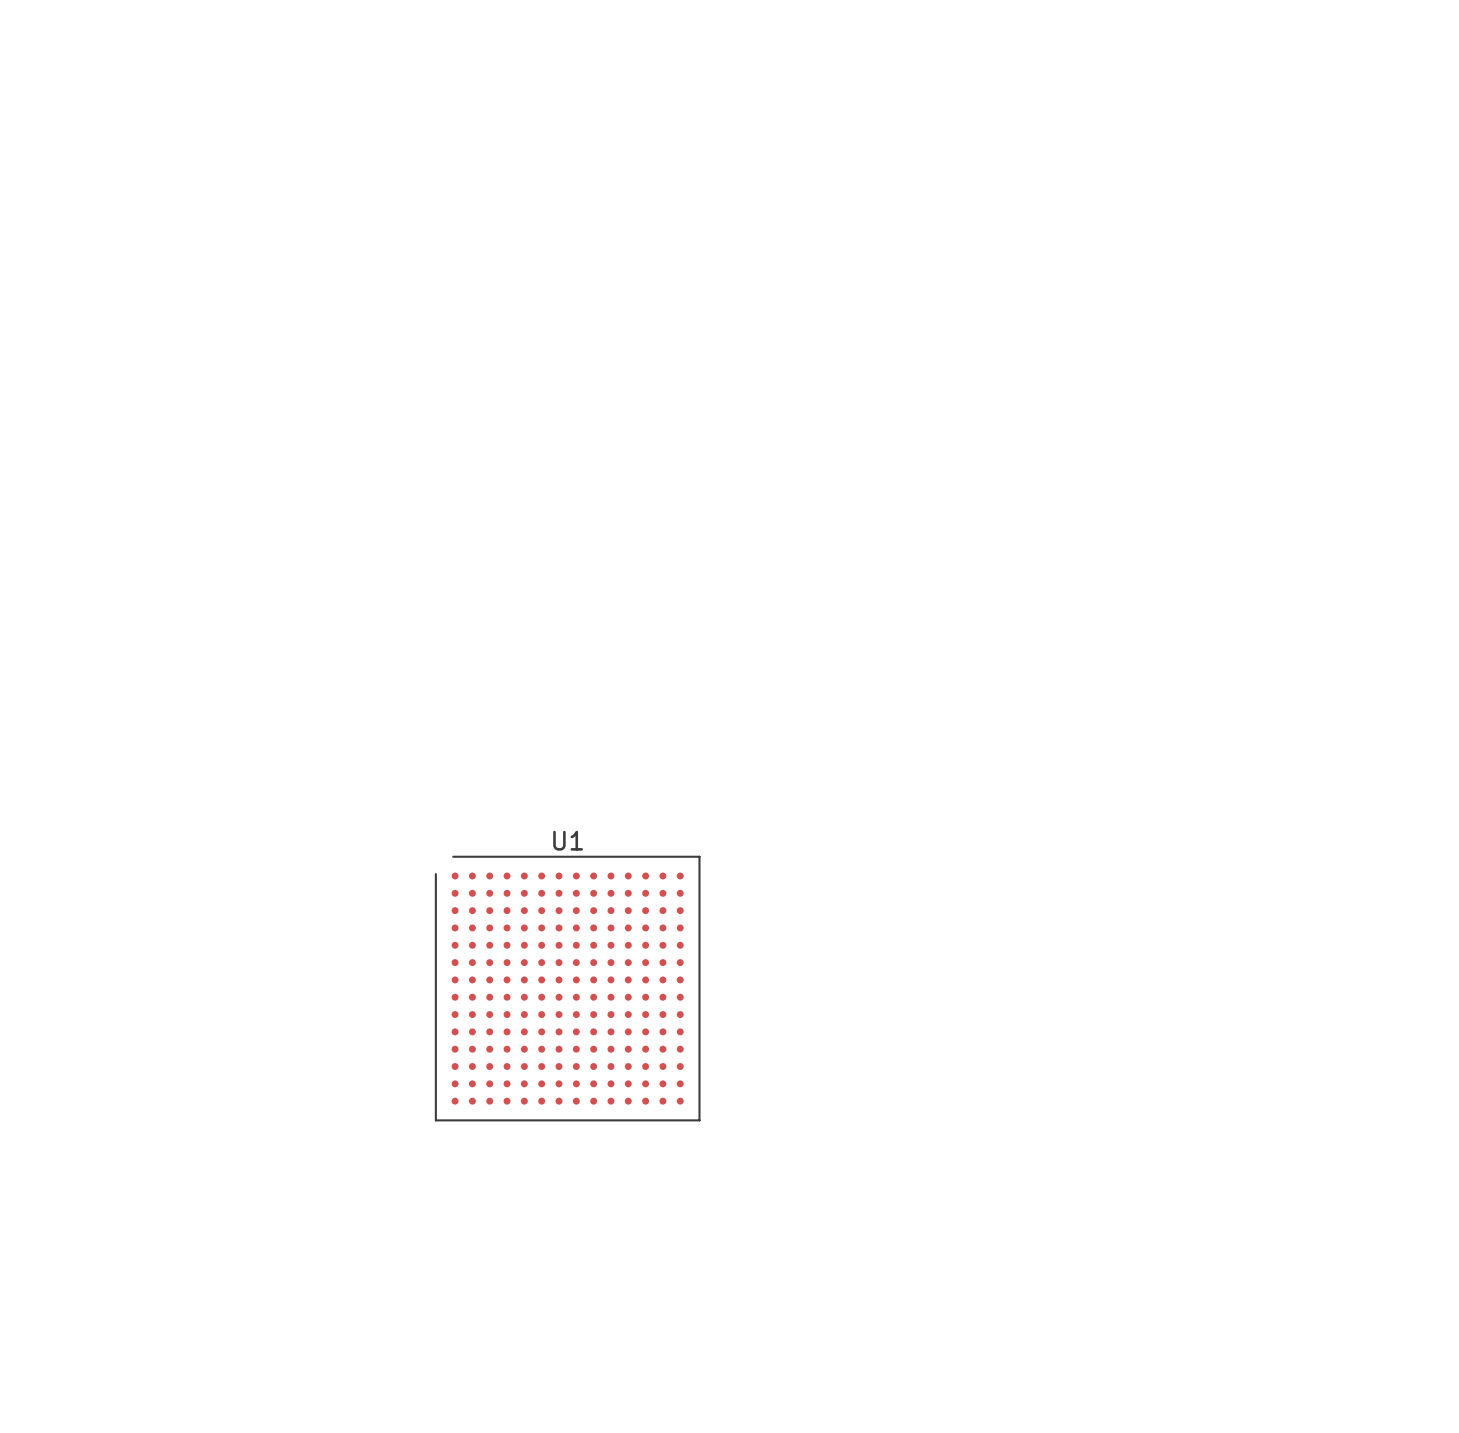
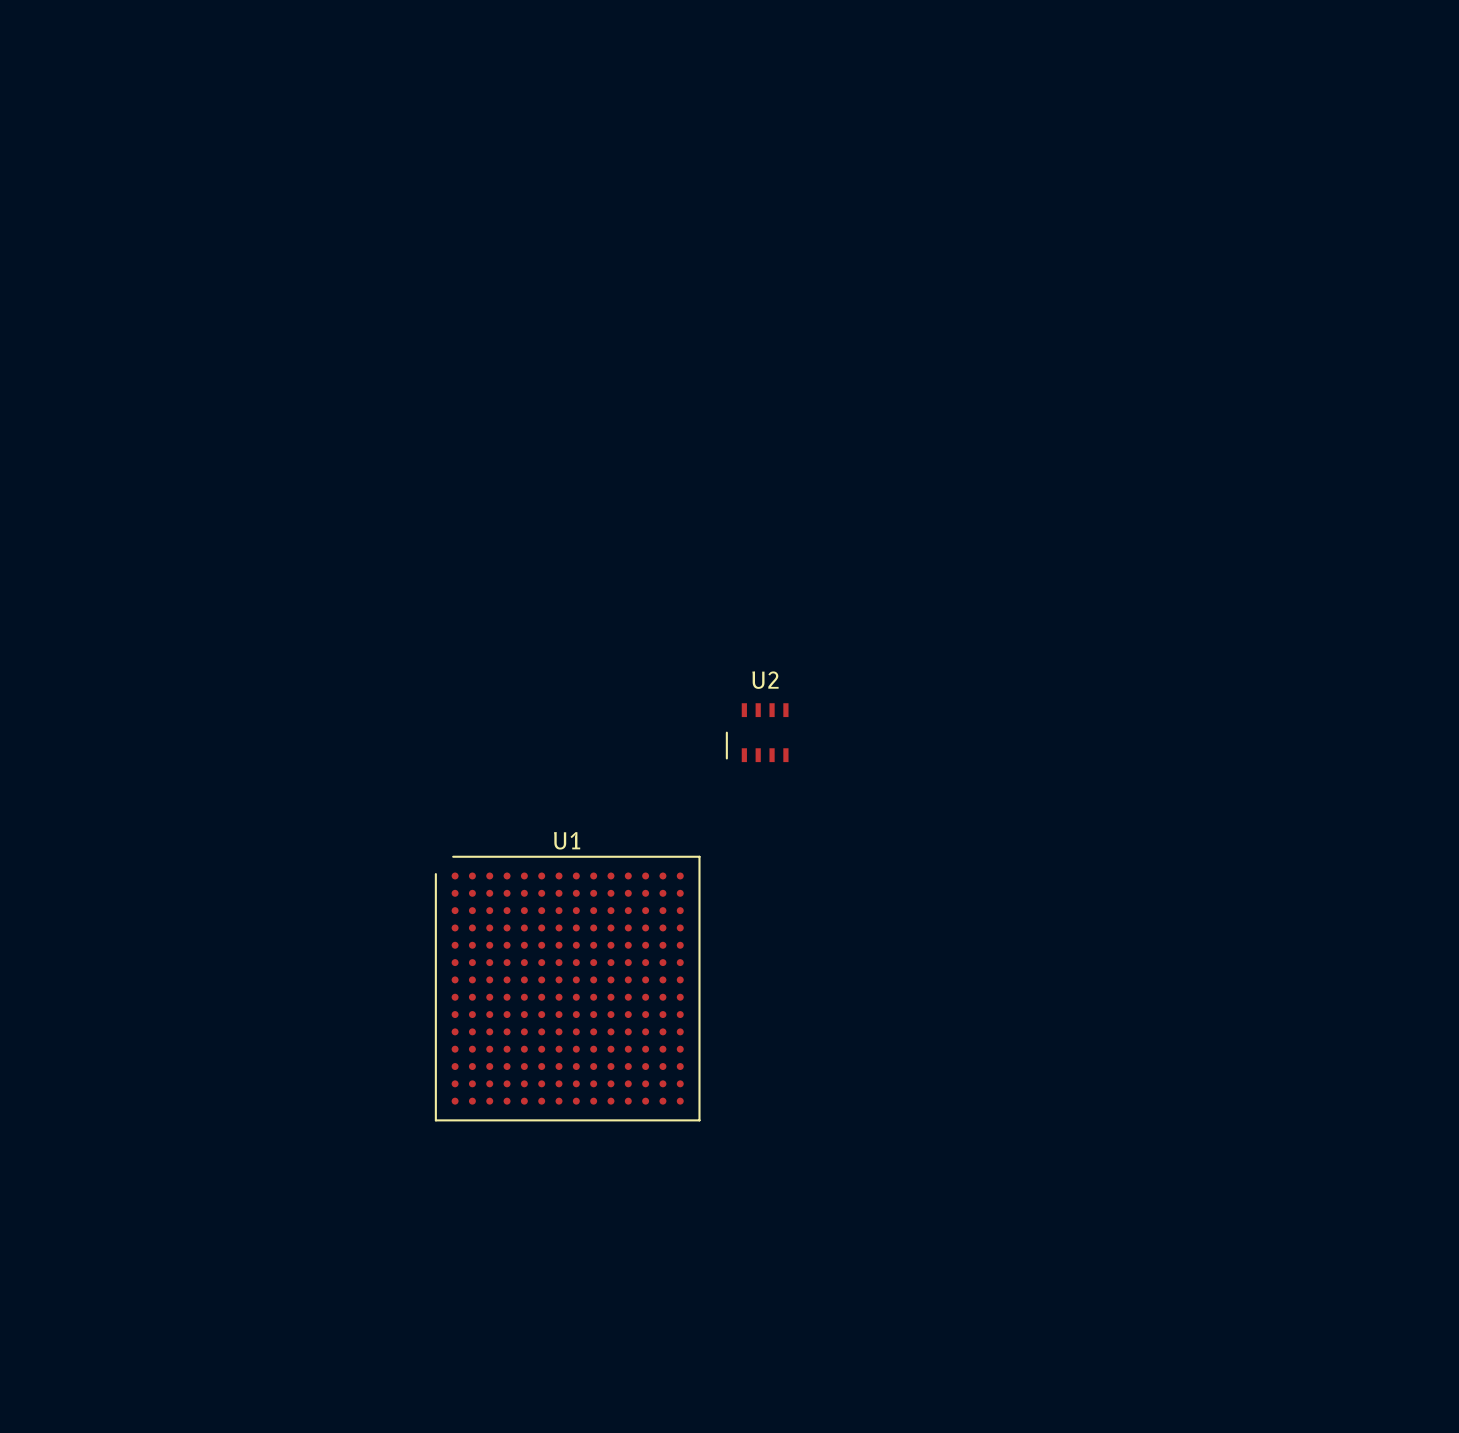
U2: none -> (757, 732)

